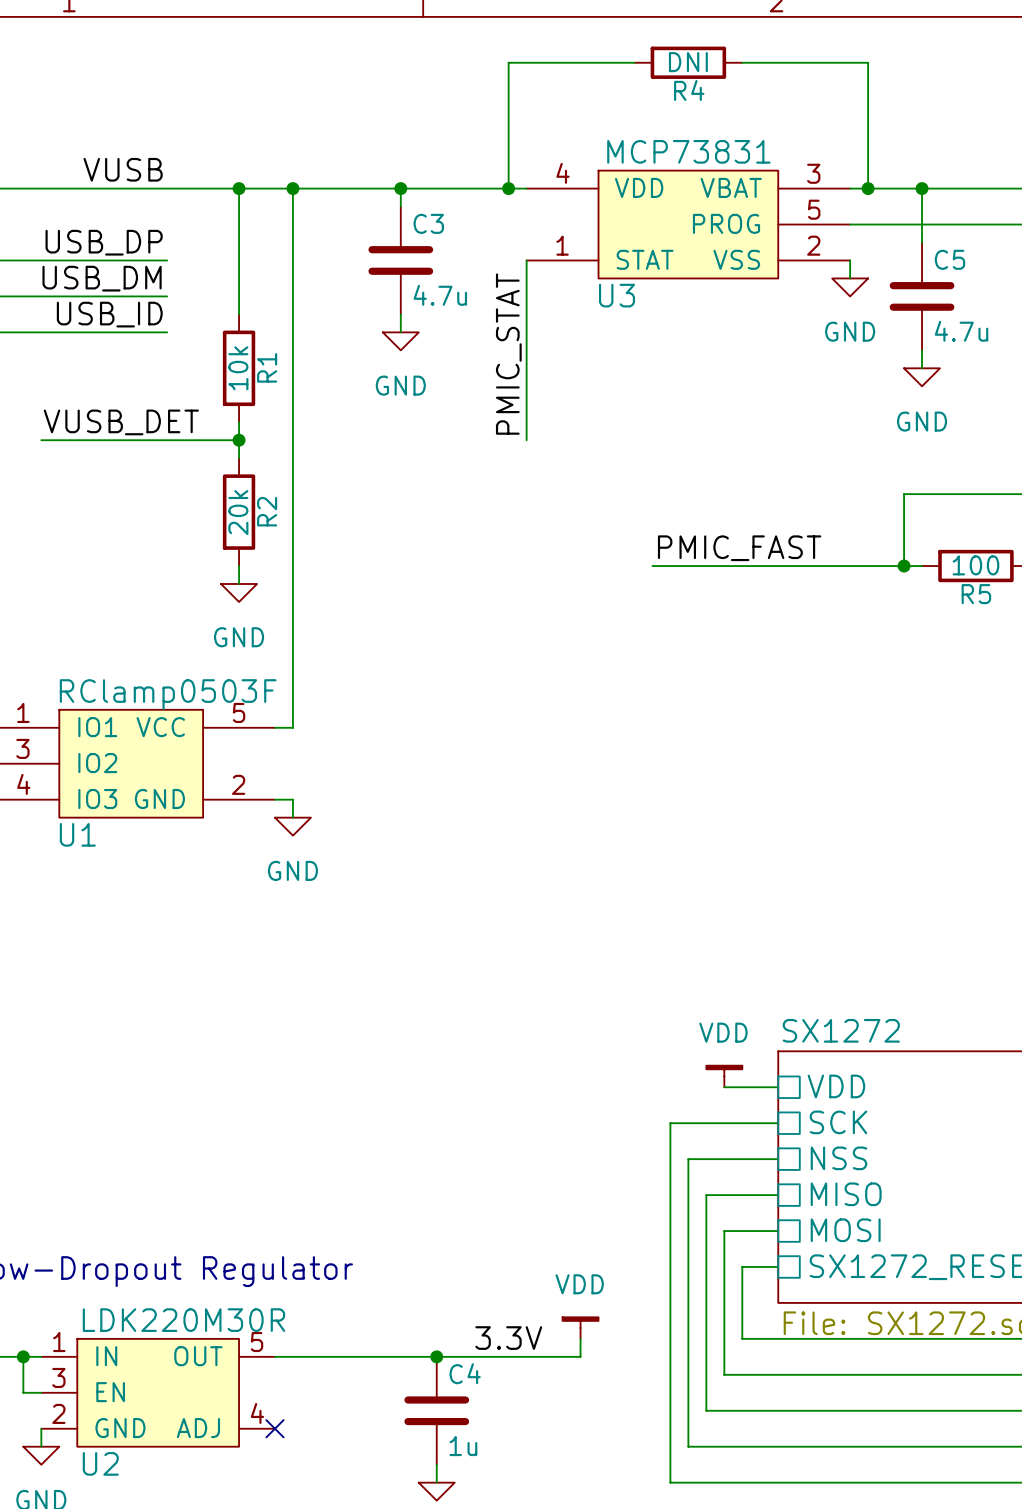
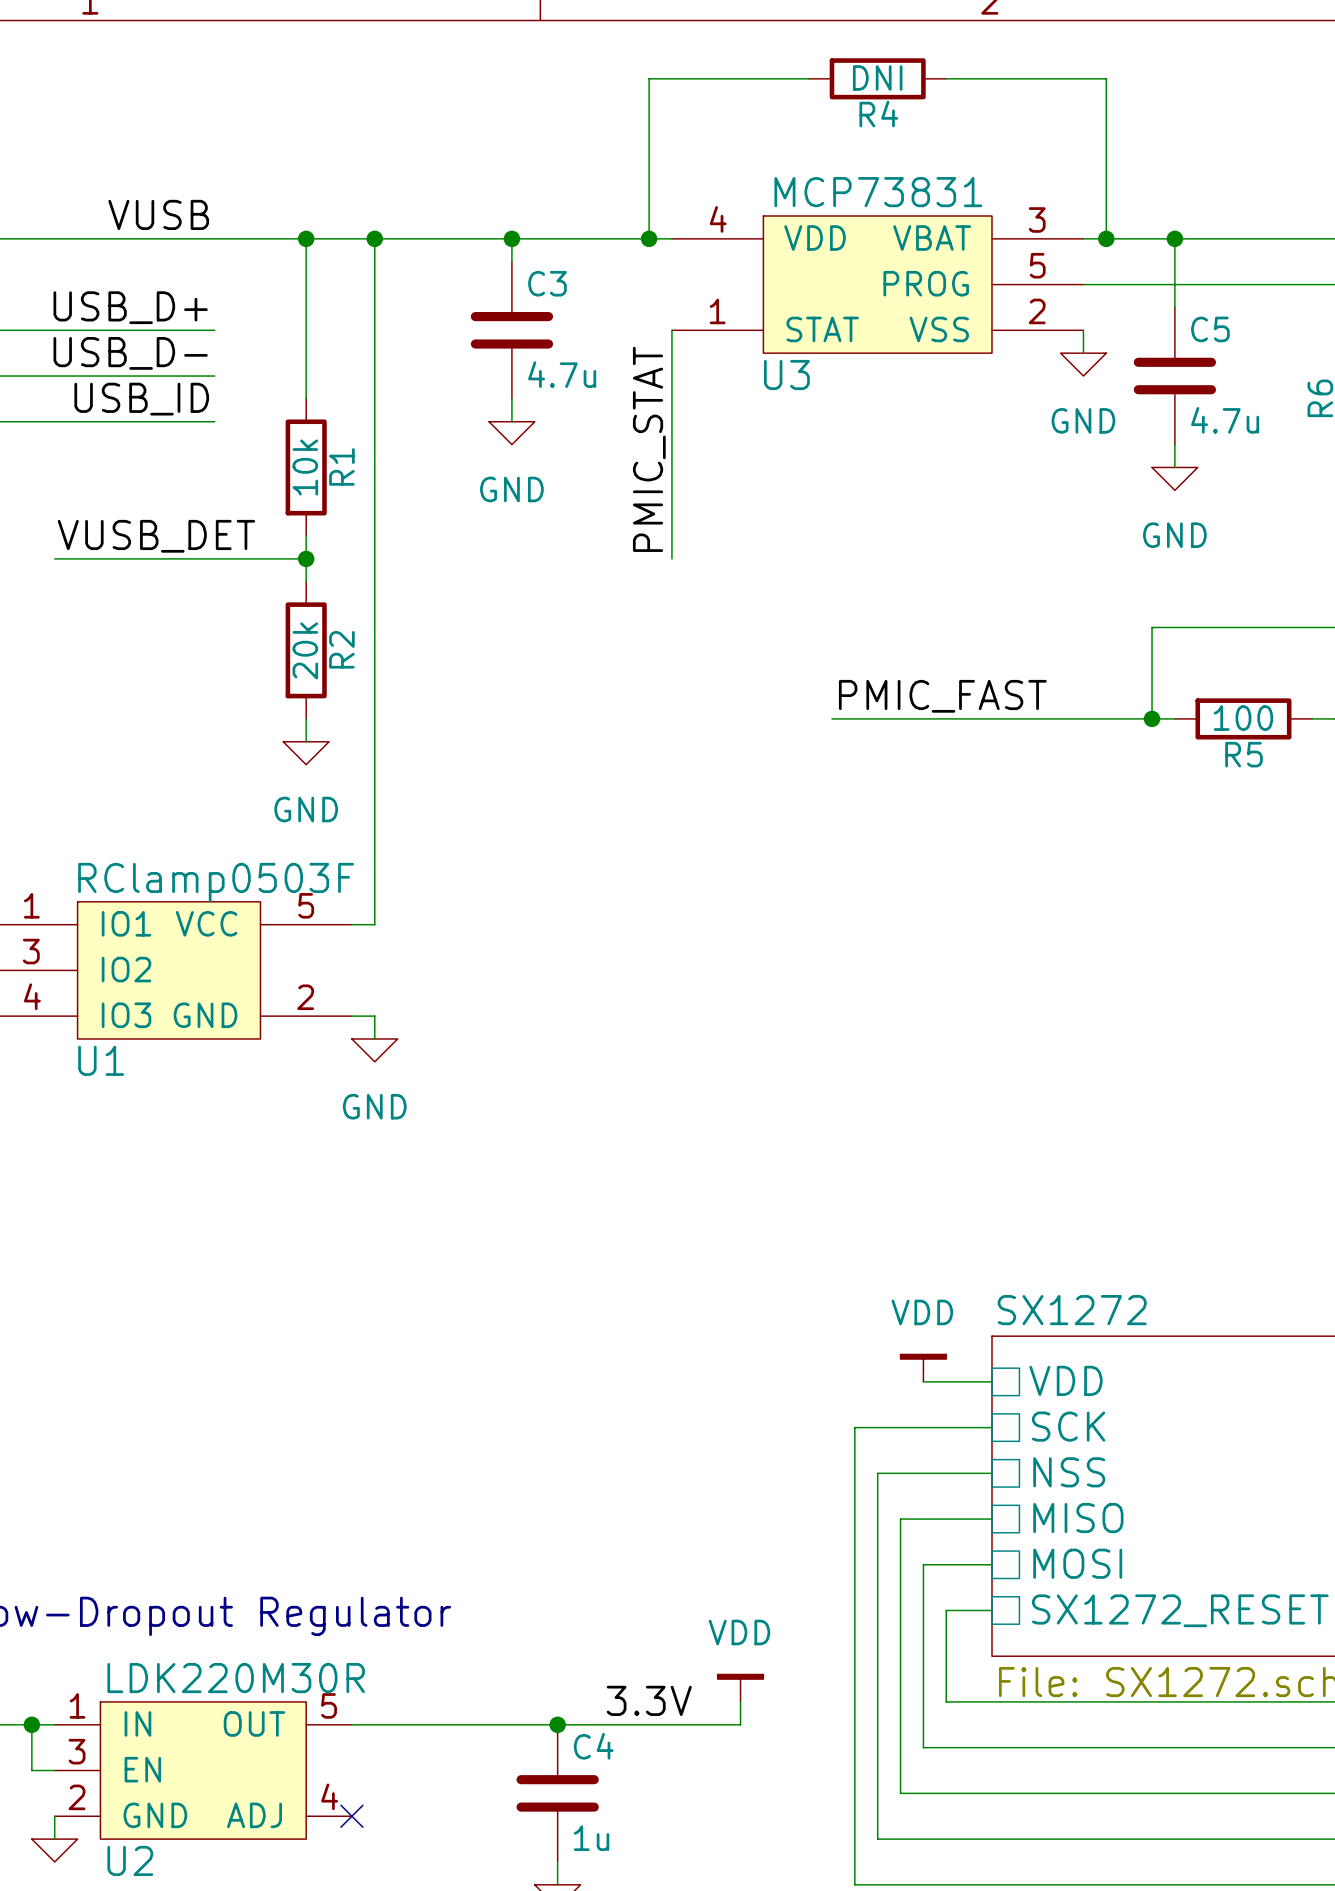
label: USB_DP (104, 242) -> USB_D+ (130, 307)
label: USB_DM (102, 278) -> USB_D- (130, 353)

